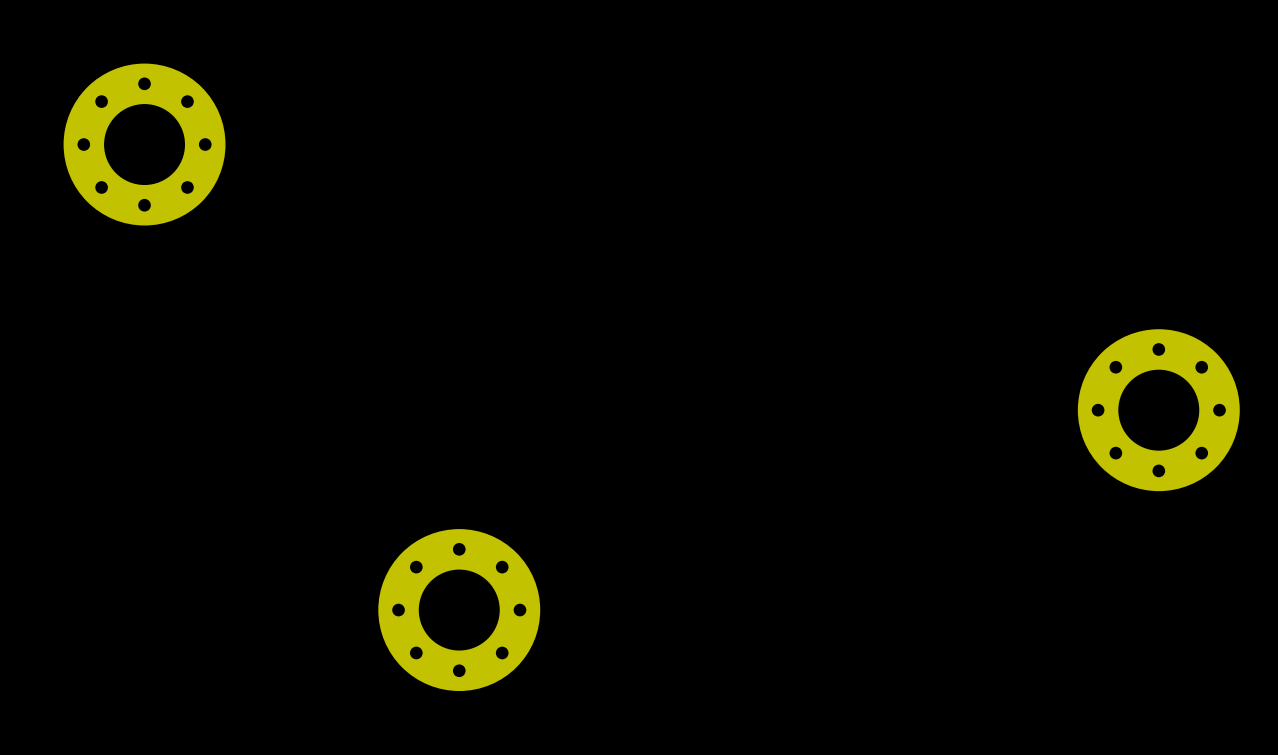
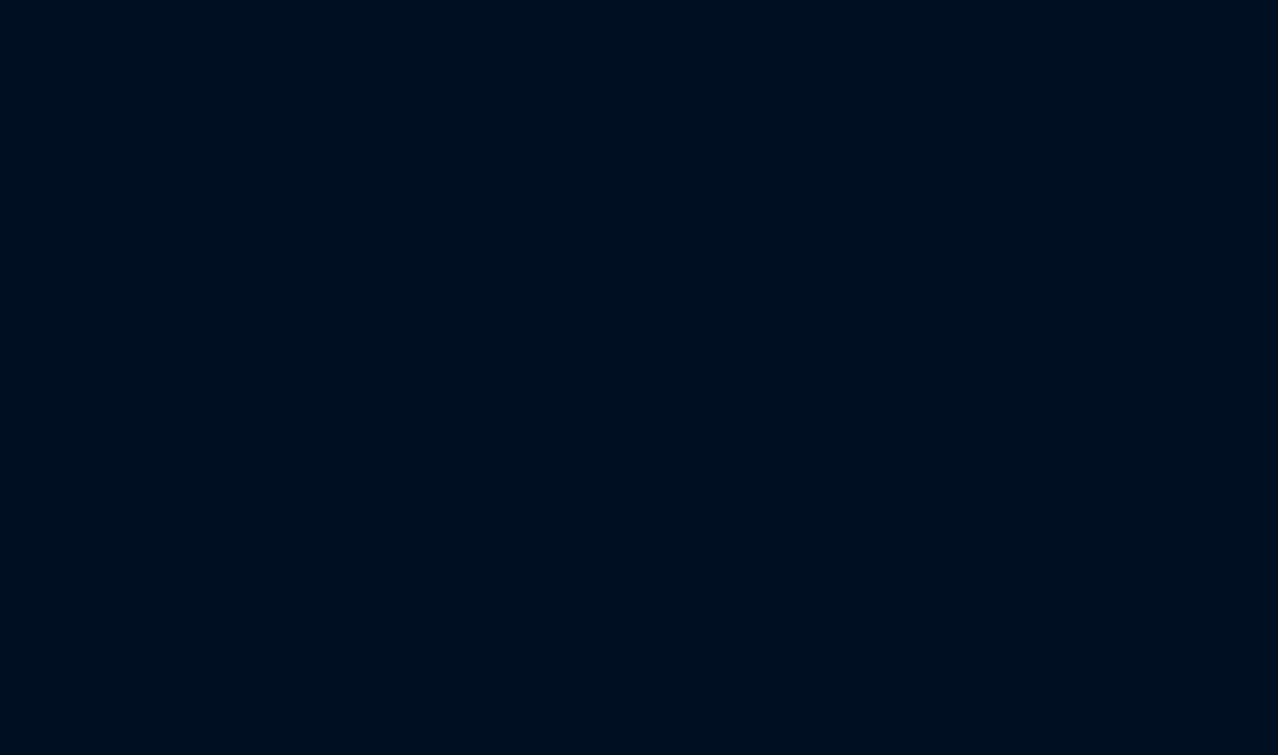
part: (144, 144) -> none
part: (1158, 410) -> none
part: (459, 610) -> none

